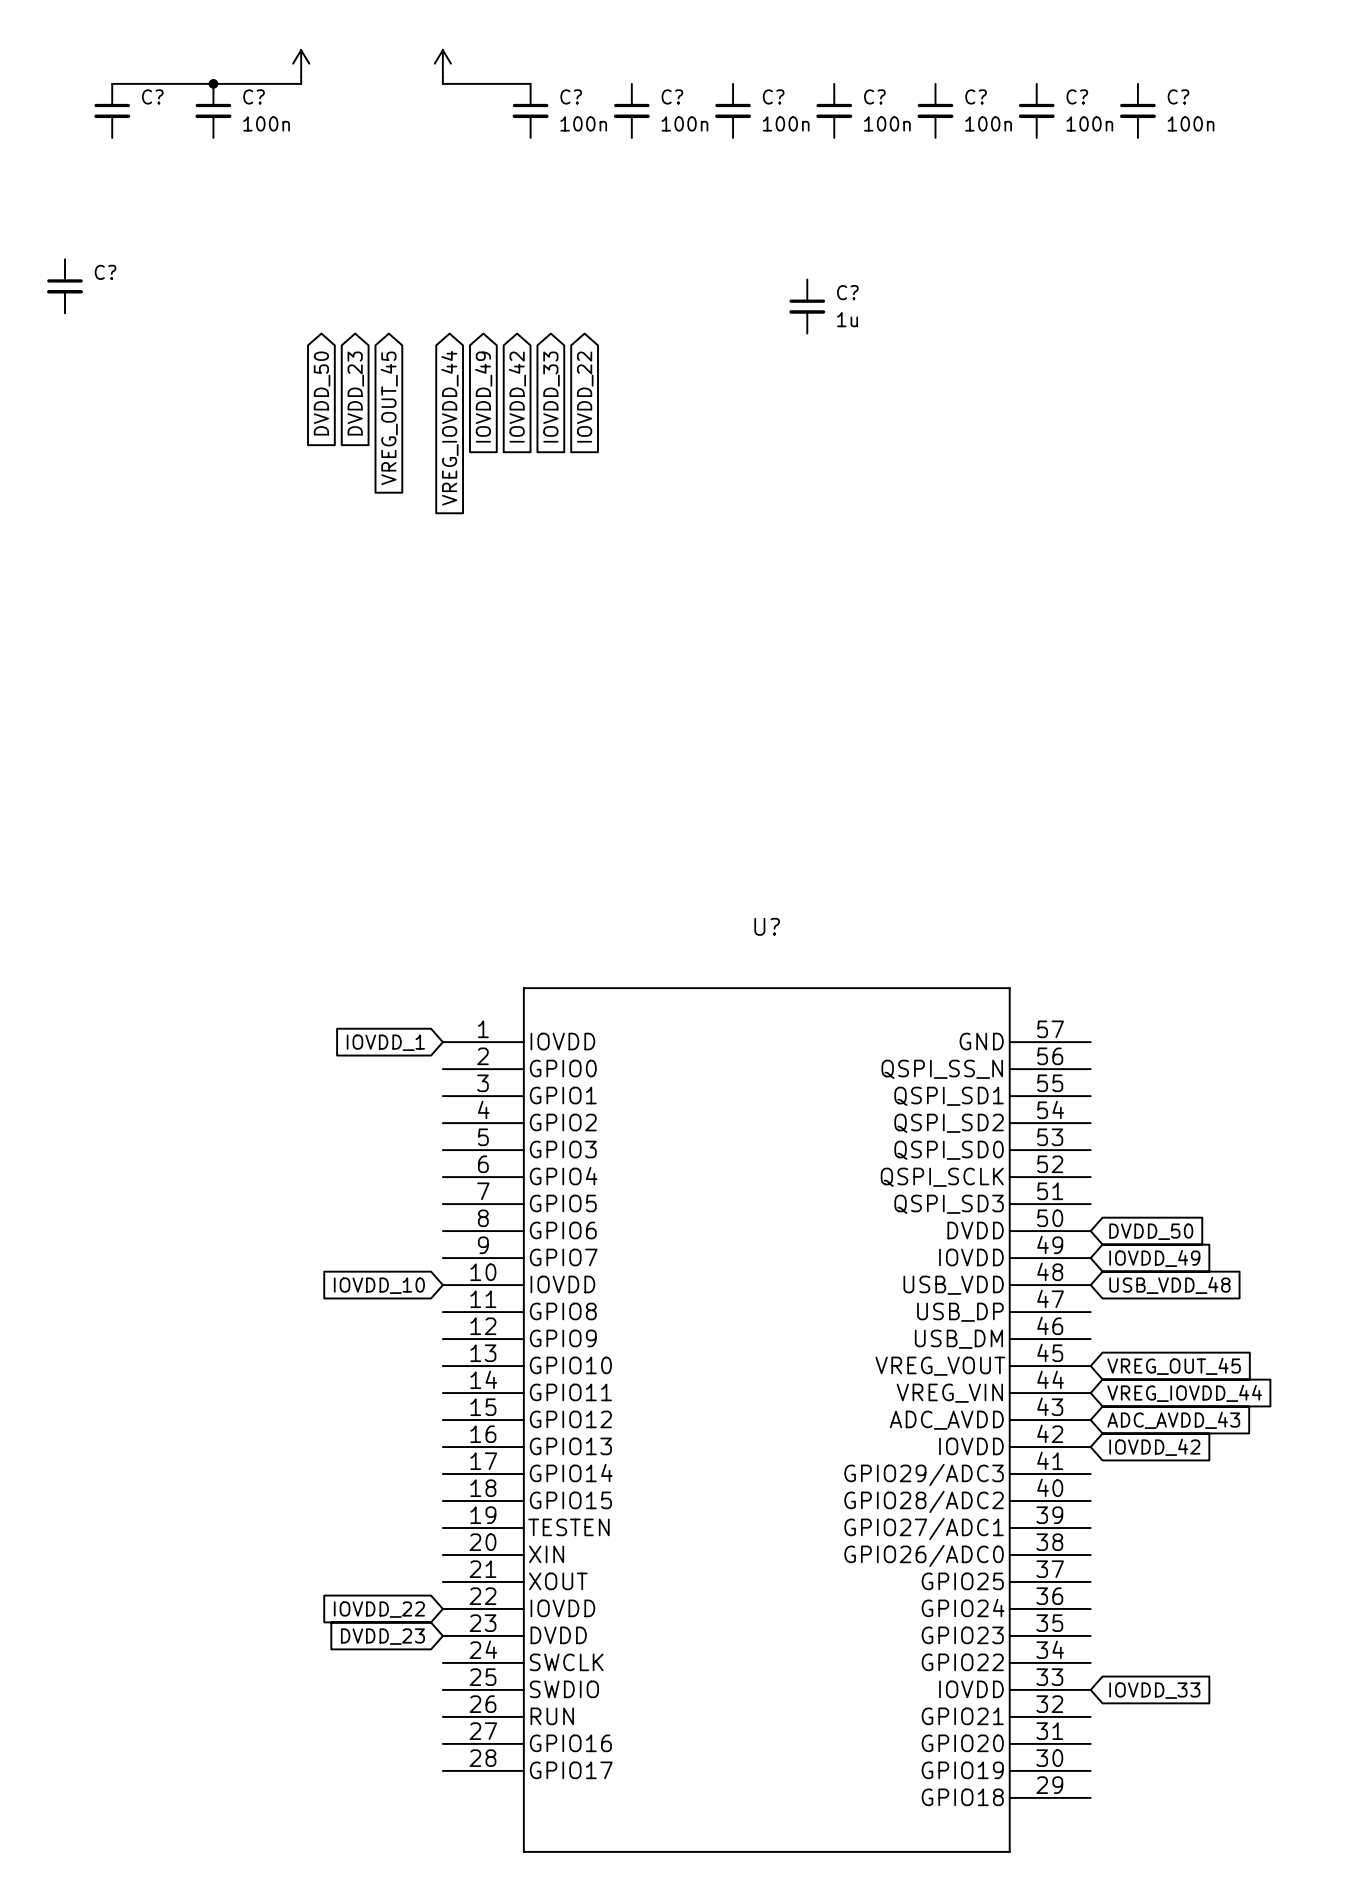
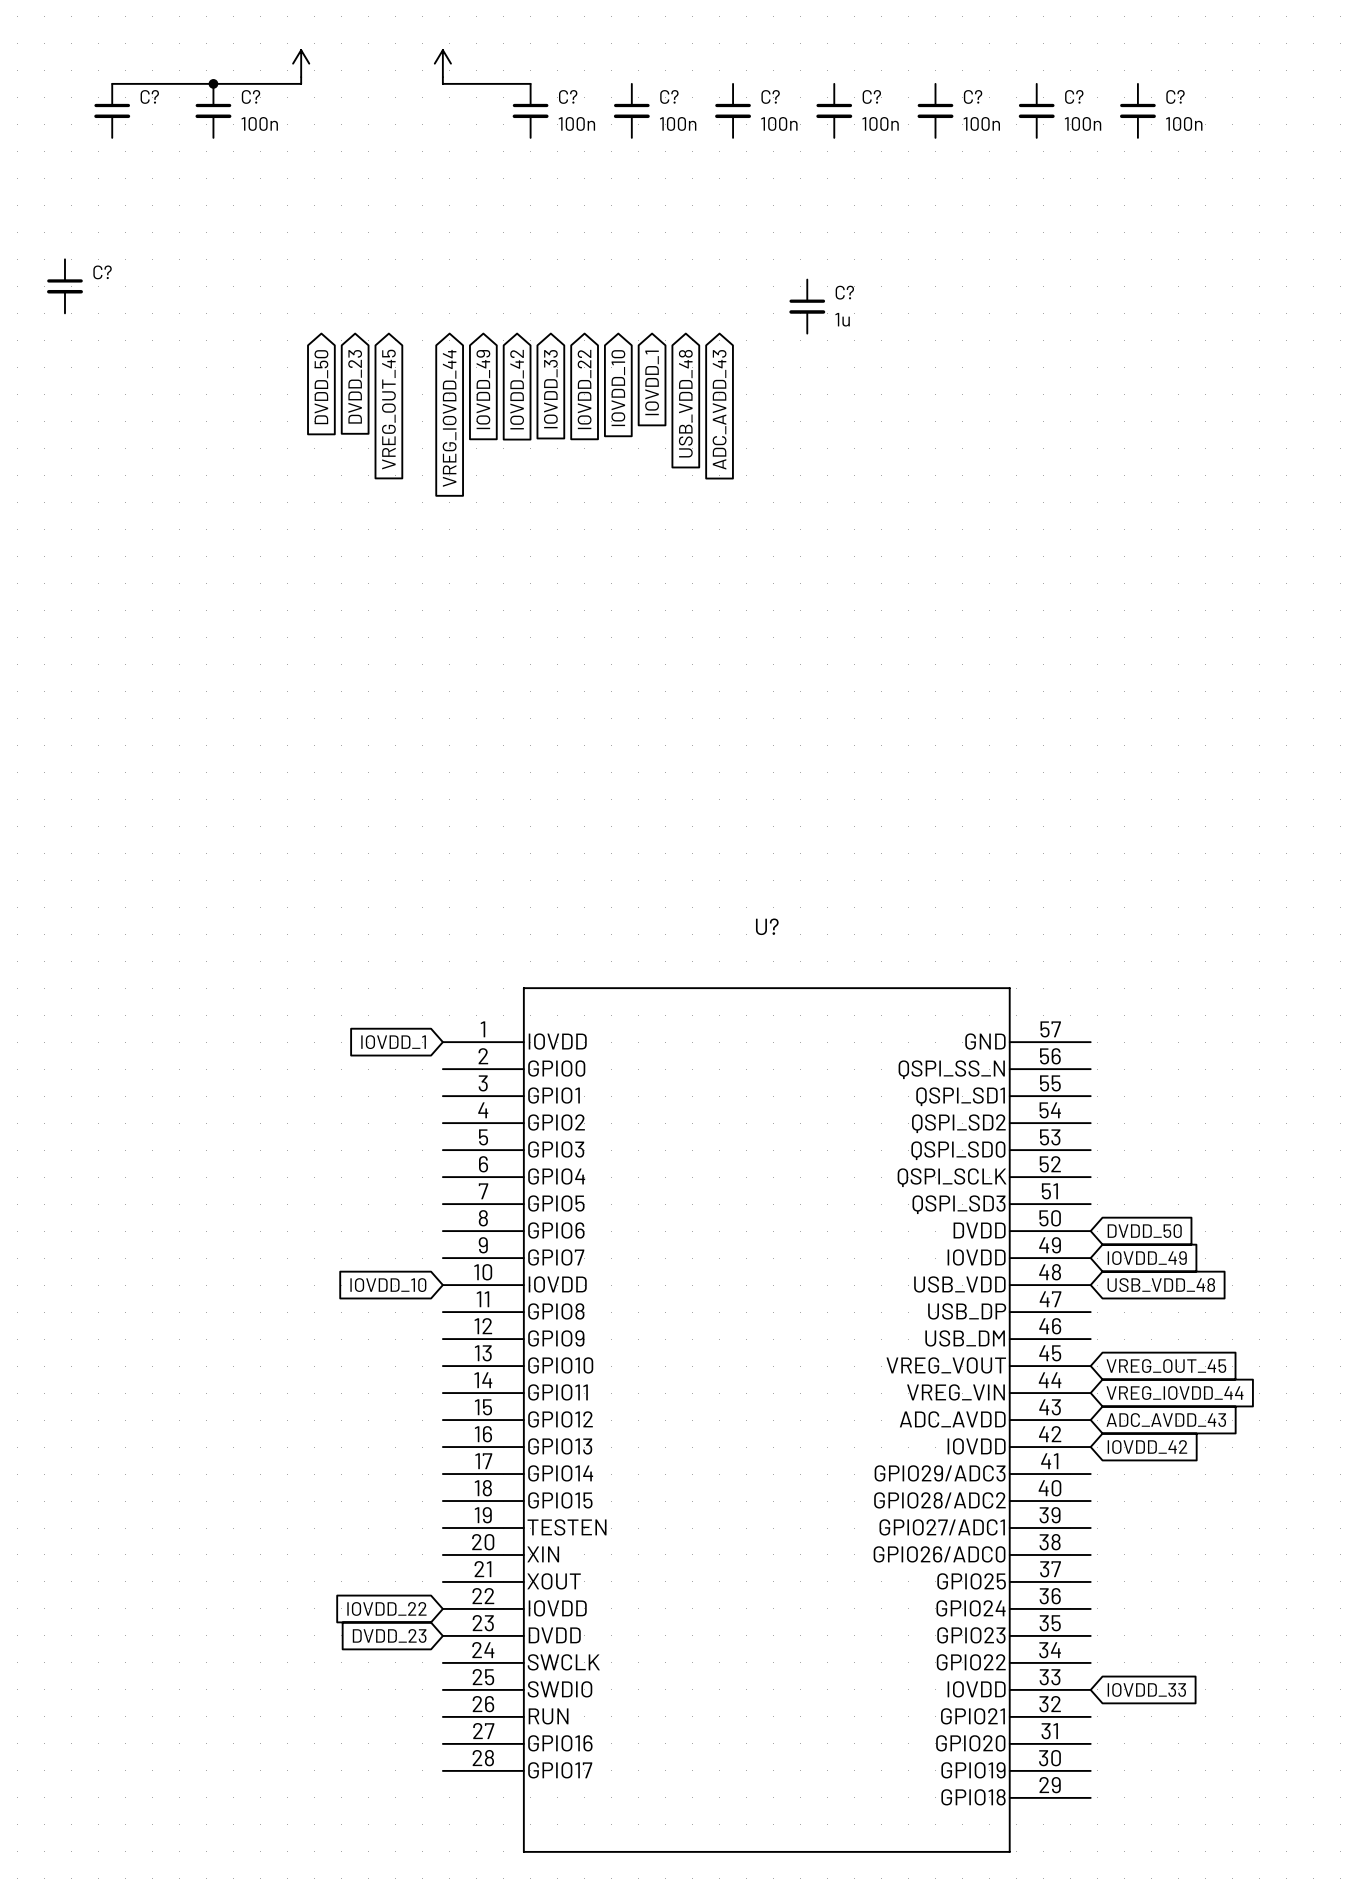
global label: none -> IOVDD_1 (652, 382)
global label: none -> IOVDD_10 (618, 388)
global label: none -> USB_VDD_48 (685, 403)
global label: none -> ADC_AVDD_43 (719, 409)

